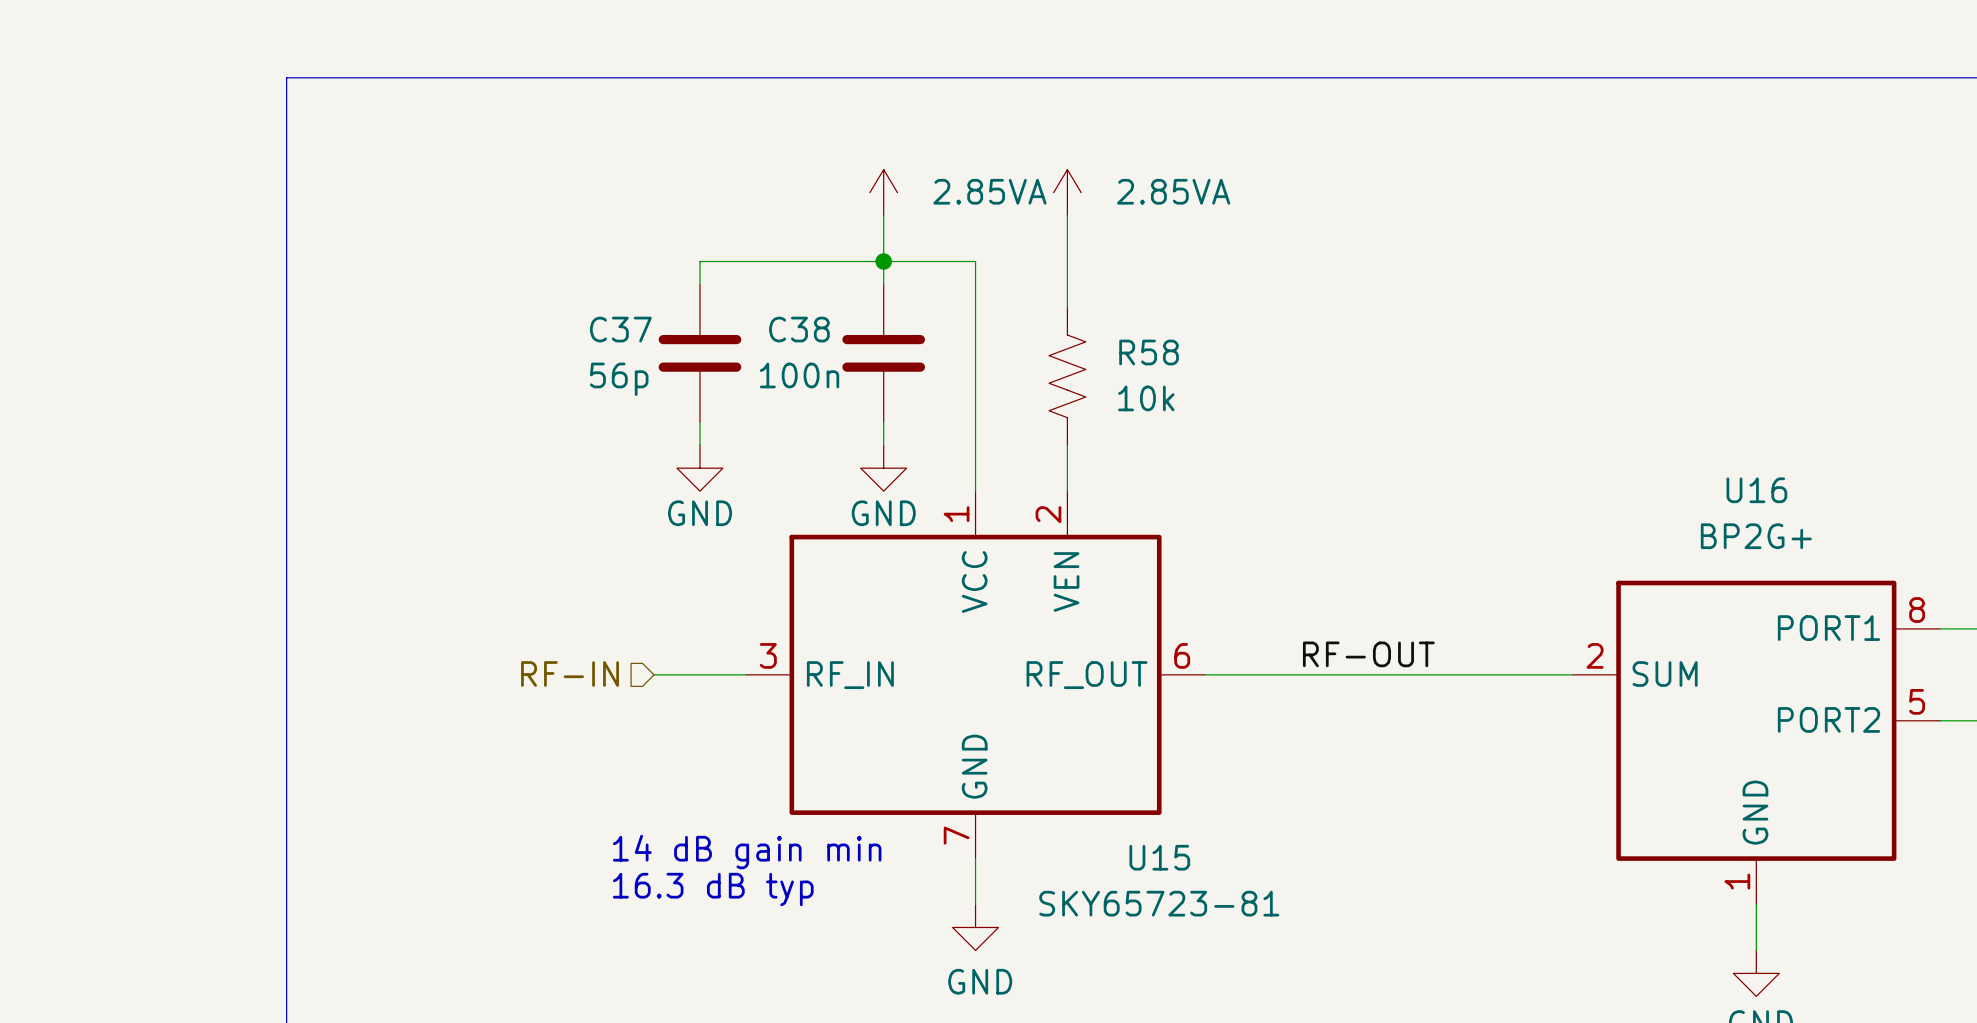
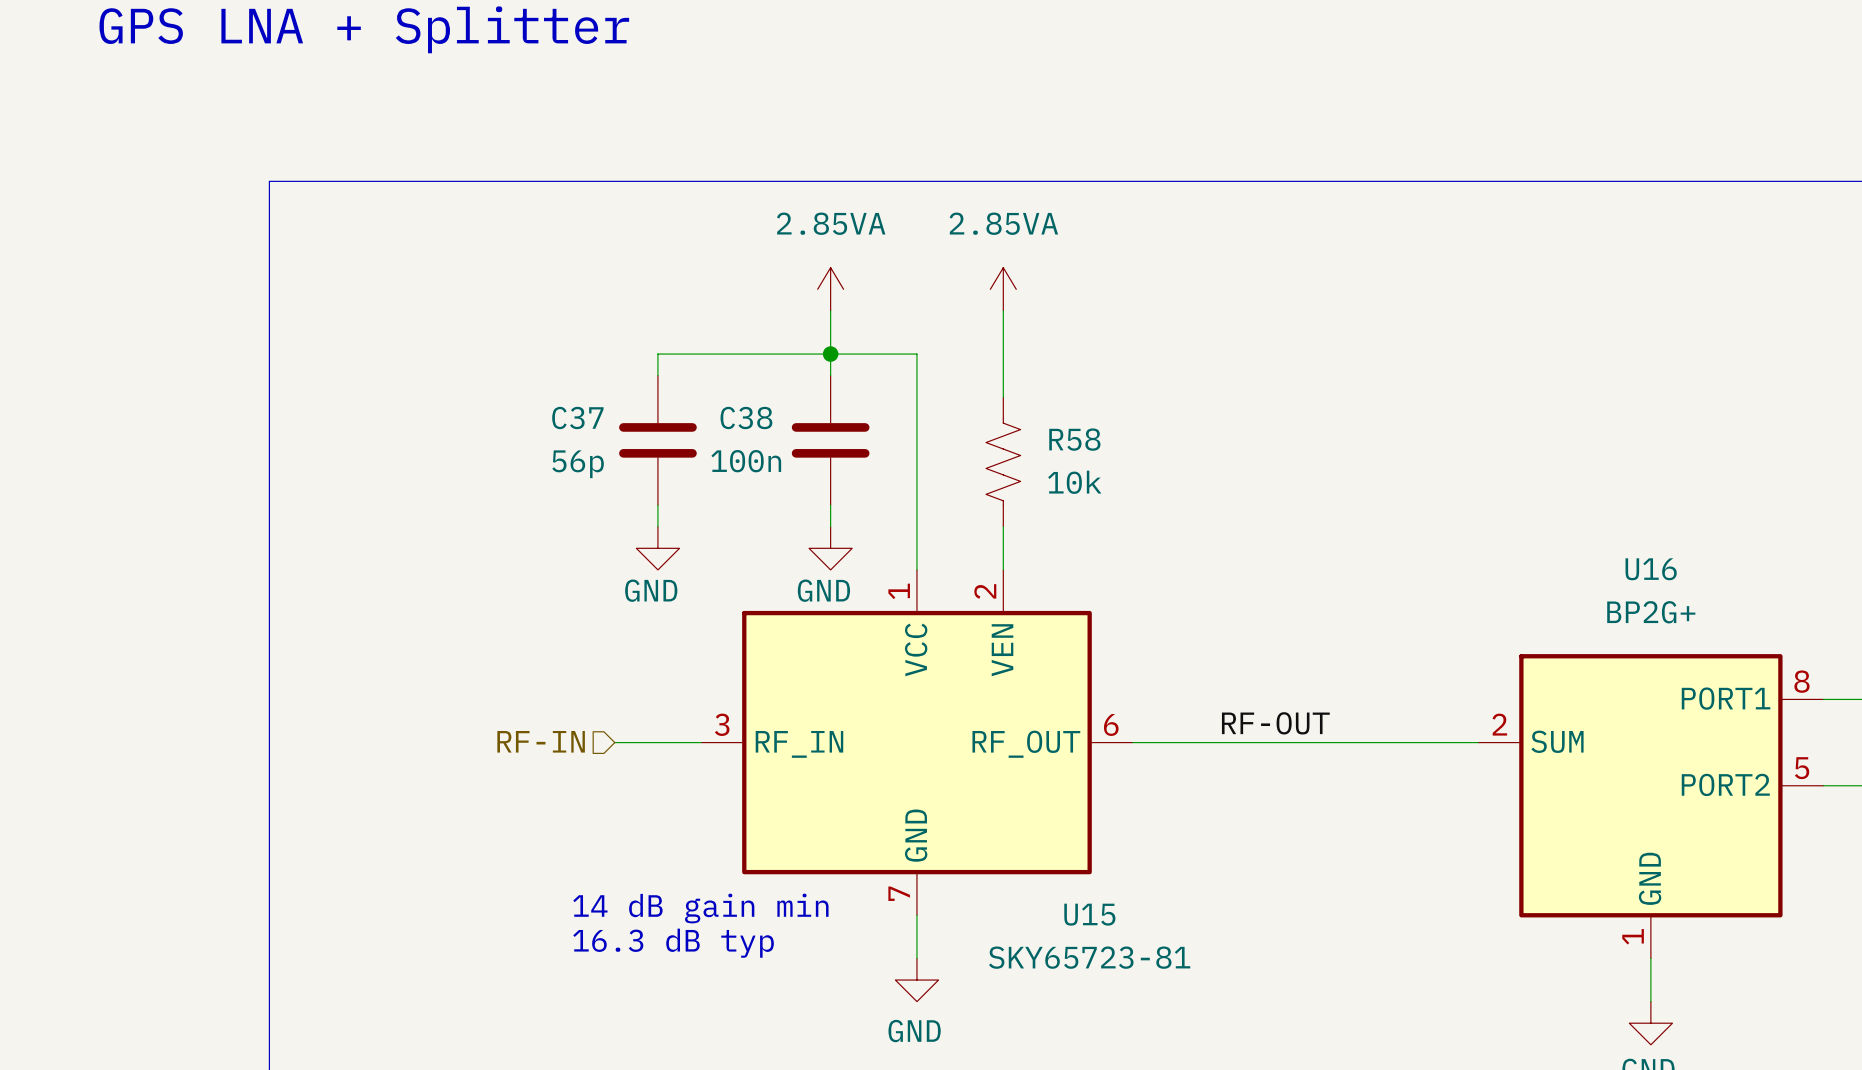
power symbol text position: 2.85VA (989, 191) -> 2.85VA (831, 223)
power symbol text position: 2.85VA (1173, 191) -> 2.85VA (1003, 223)
U15 symbol: [745, 491, 1206, 859] -> [701, 569, 1133, 916]
U16 symbol: [1572, 580, 1941, 905] -> [1478, 654, 1824, 959]

